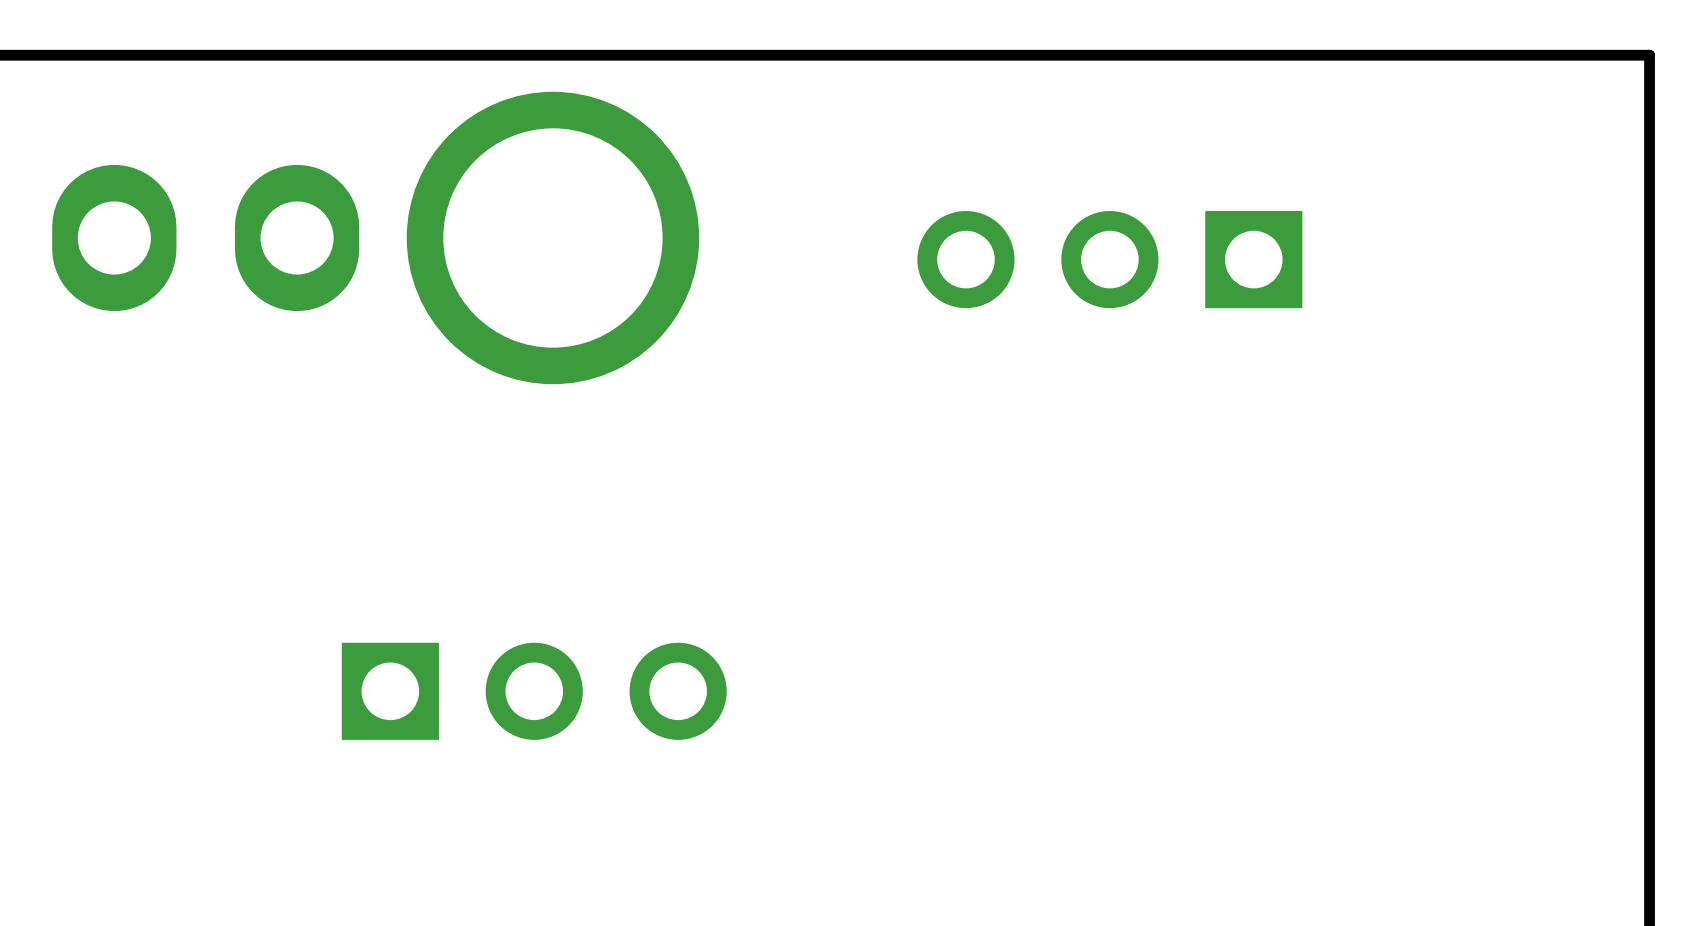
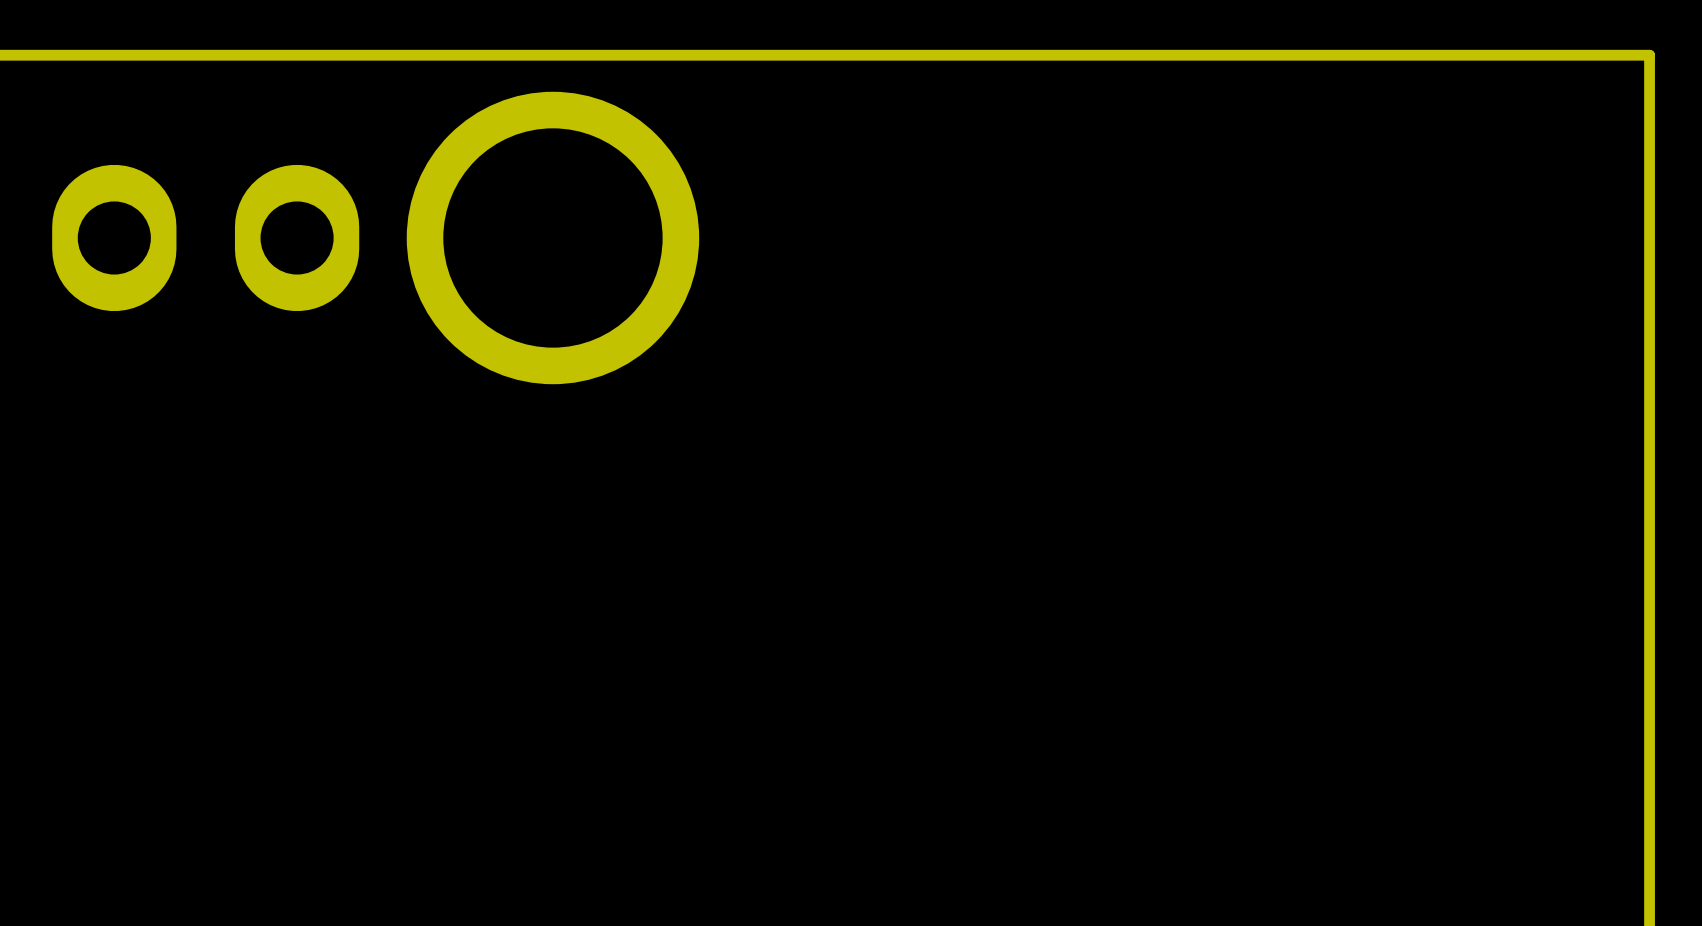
part: (1109, 259) -> none
part: (534, 691) -> none

